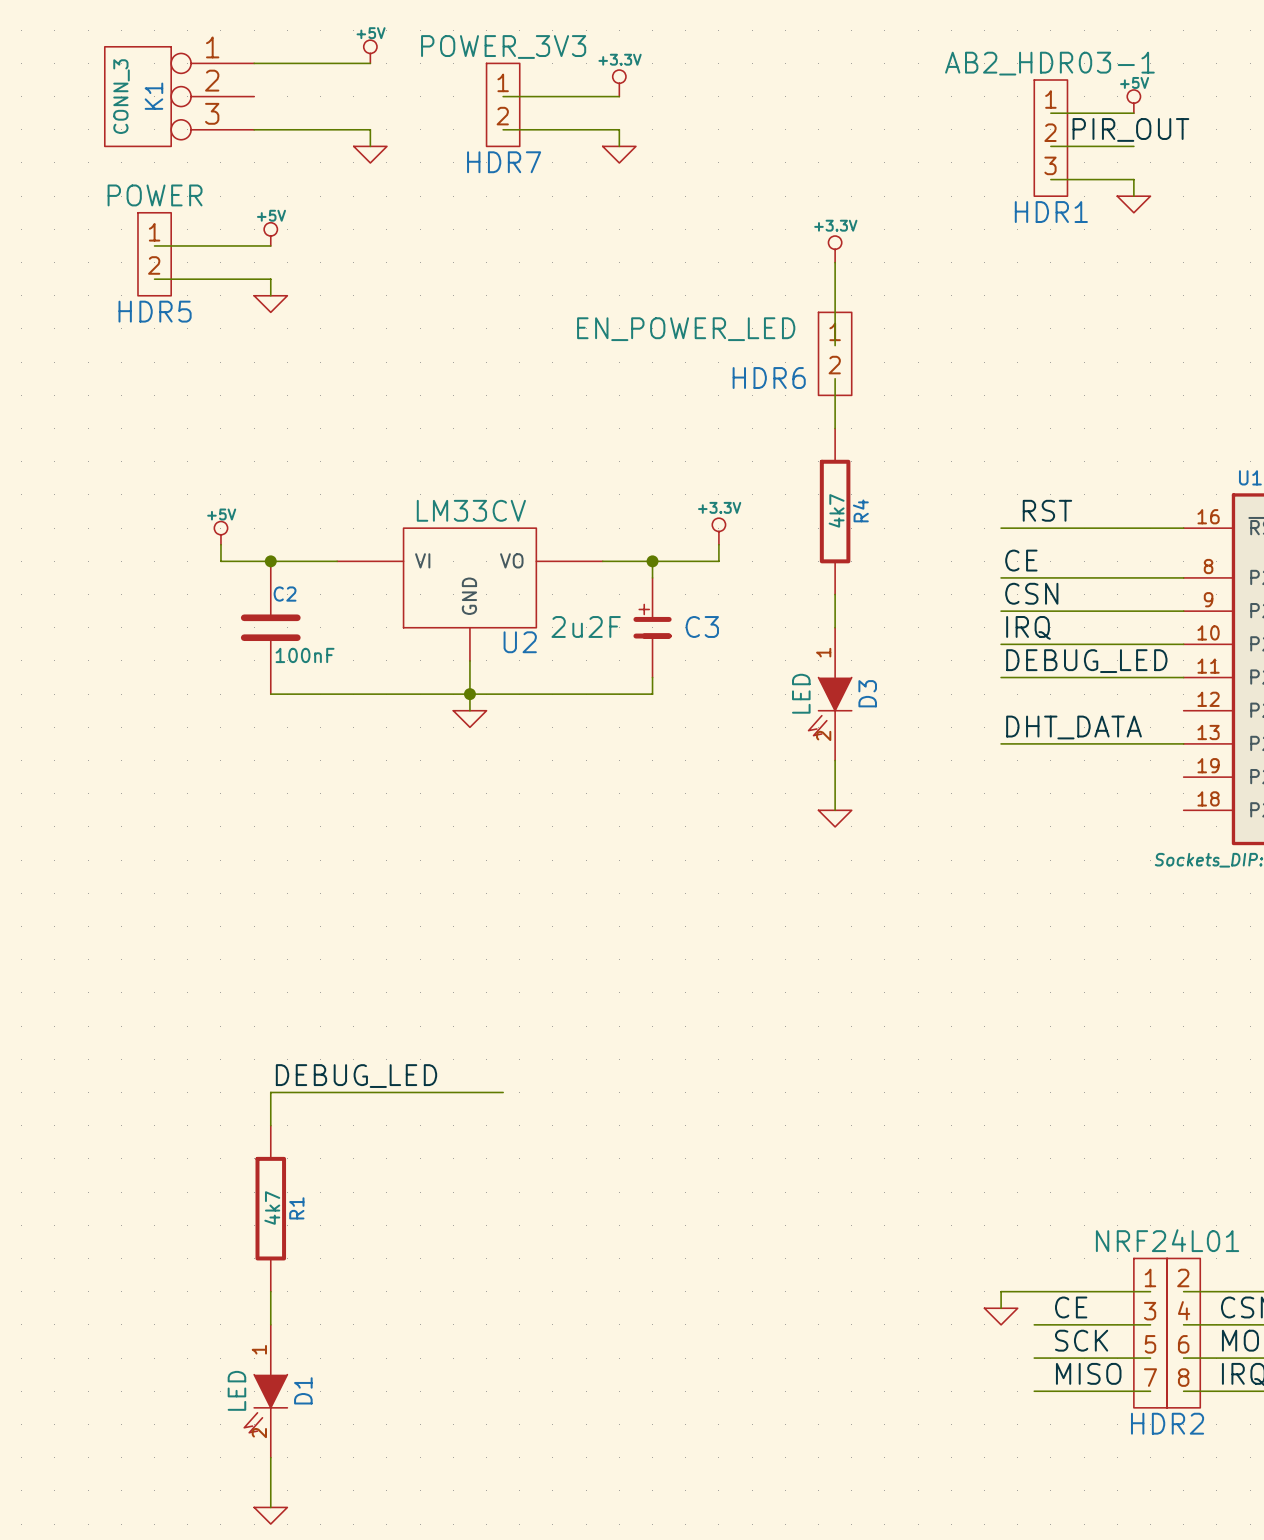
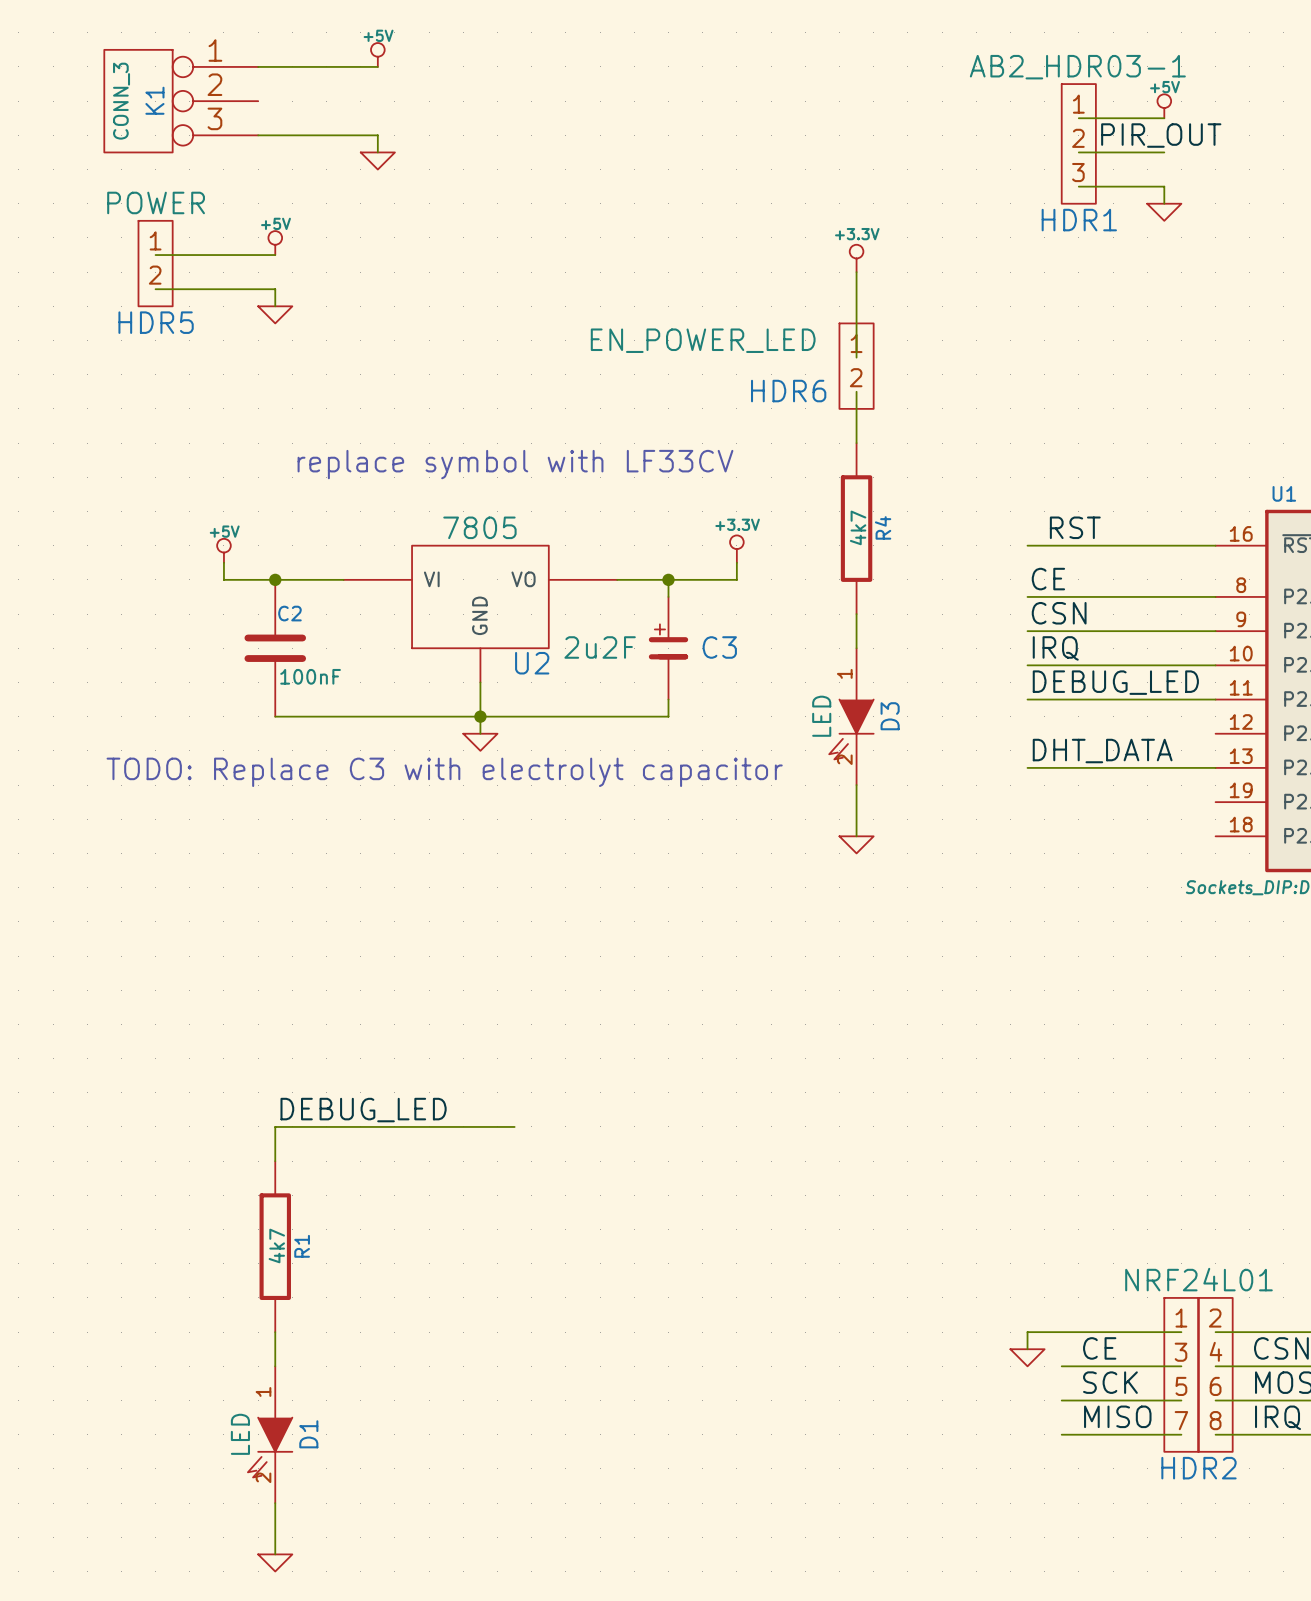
power symbol: +3.3V (619, 83) -> none
wire: (503, 96) (619, 96) -> none
HDR7: POWER_3V3 (503, 104) -> none
wire: (503, 129) (619, 129) (619, 146) -> none
power symbol: (619, 154) -> none
text: none -> replace symbol with LF33CV (515, 464)
U2 value: LM33CV (471, 510) -> 7805 (479, 527)
text: none -> TODO: Replace C3 with electrolyt capacitor (444, 772)

